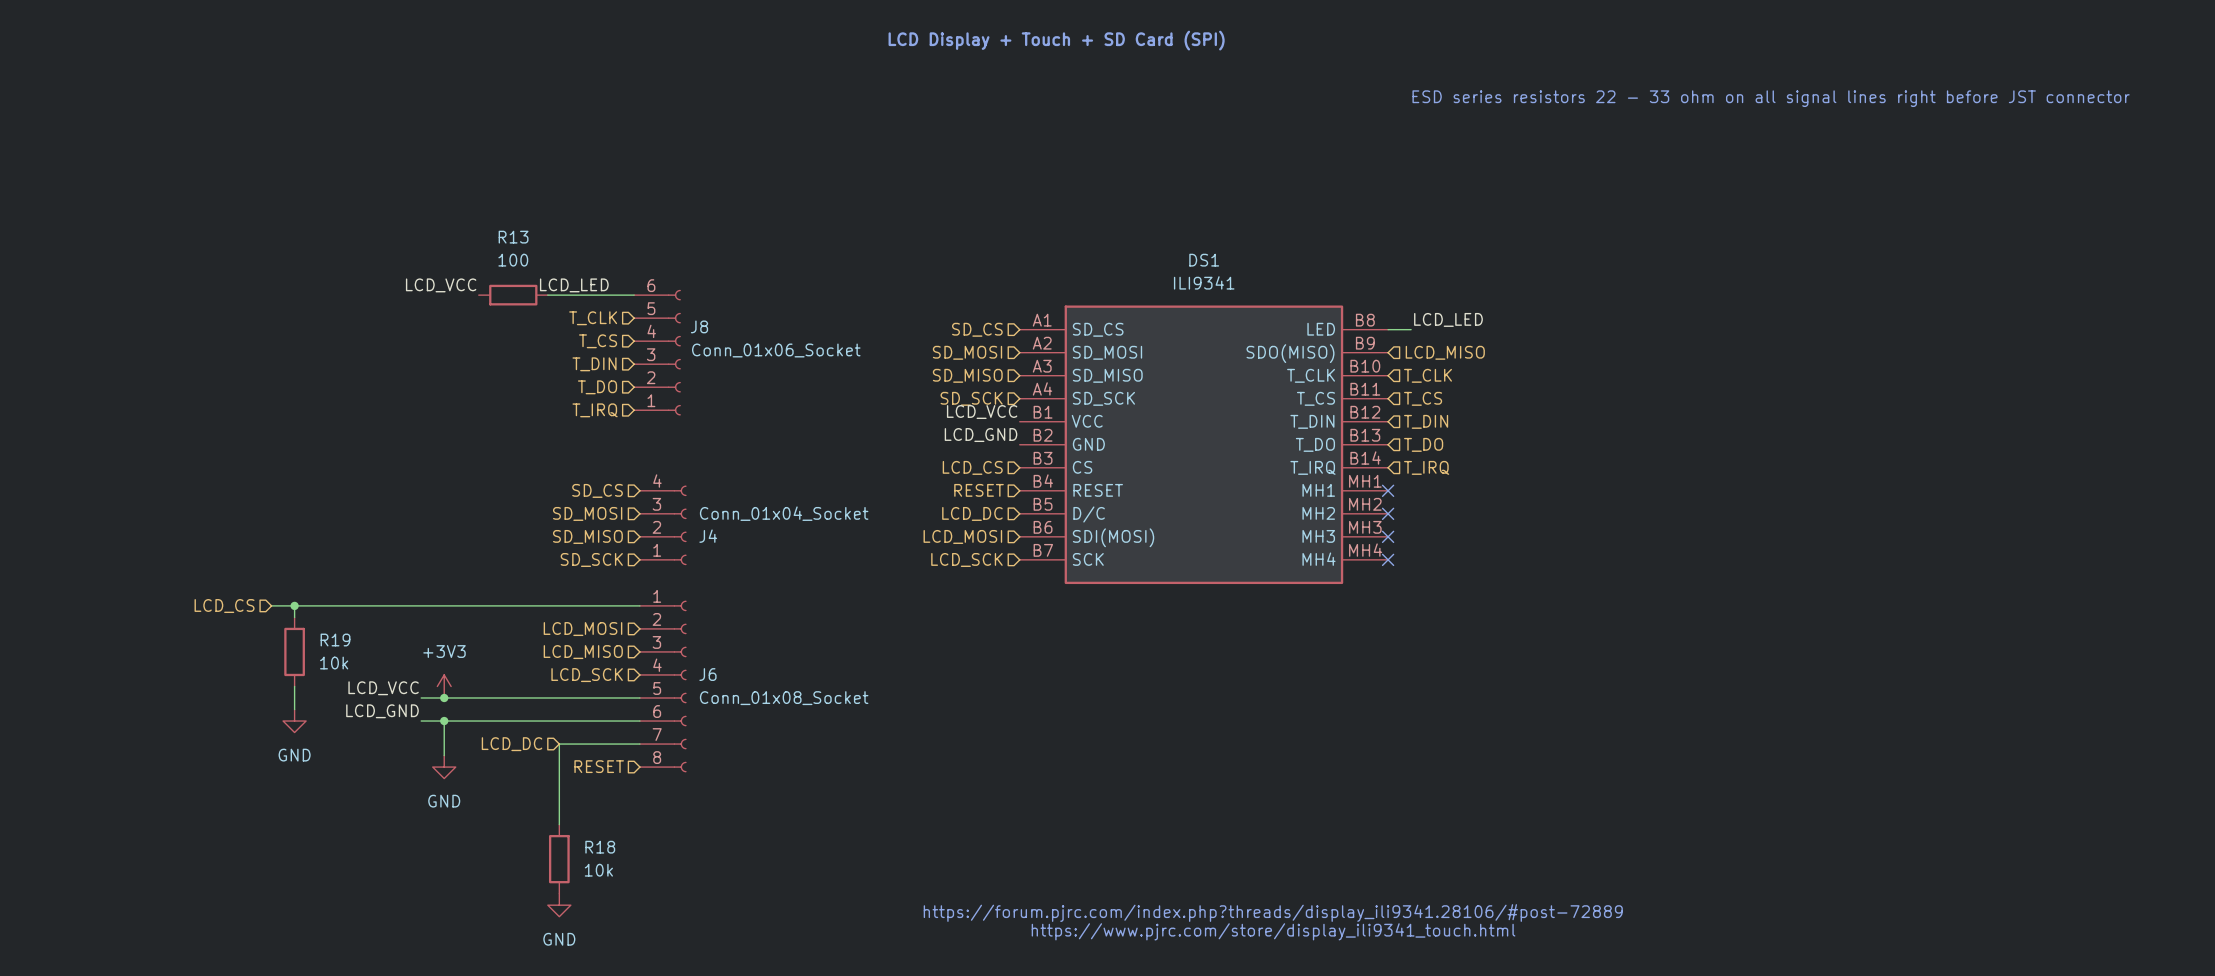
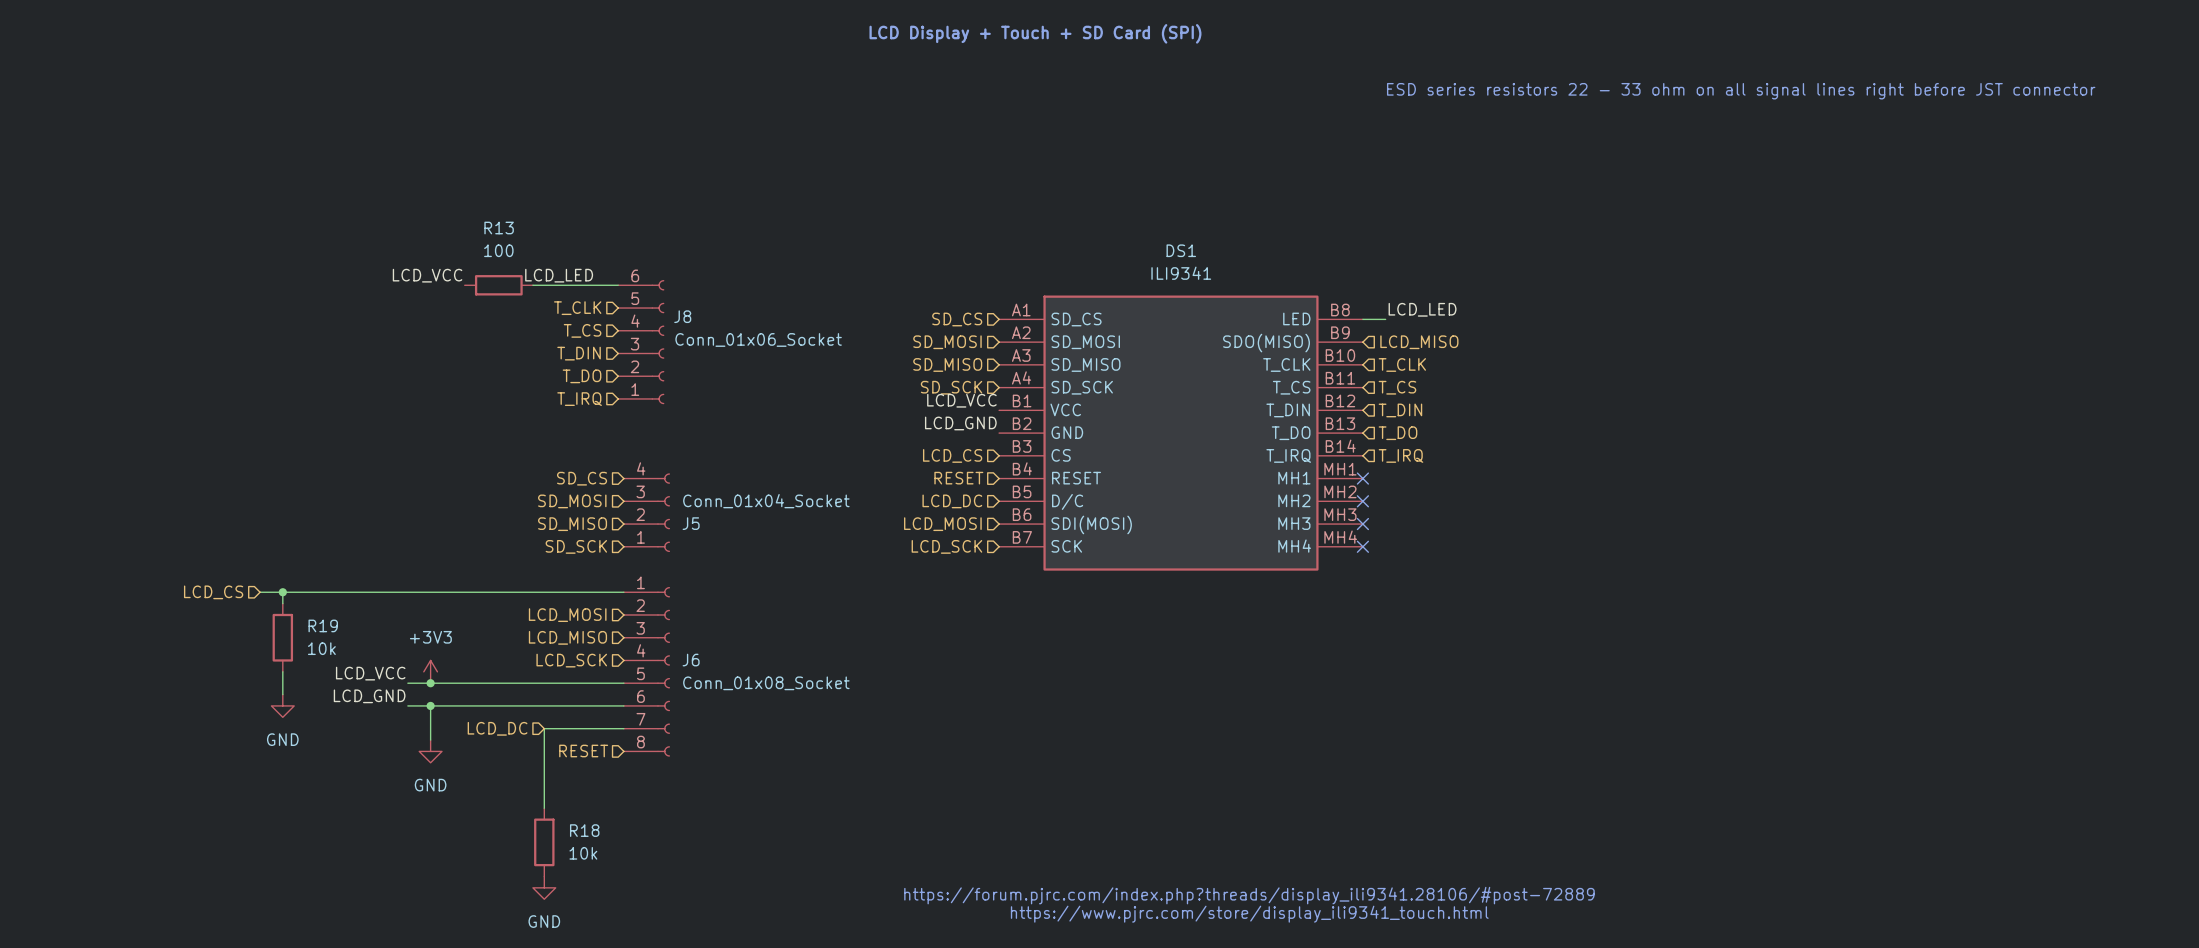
J4 name: J4 (708, 536) -> J5 (691, 523)

